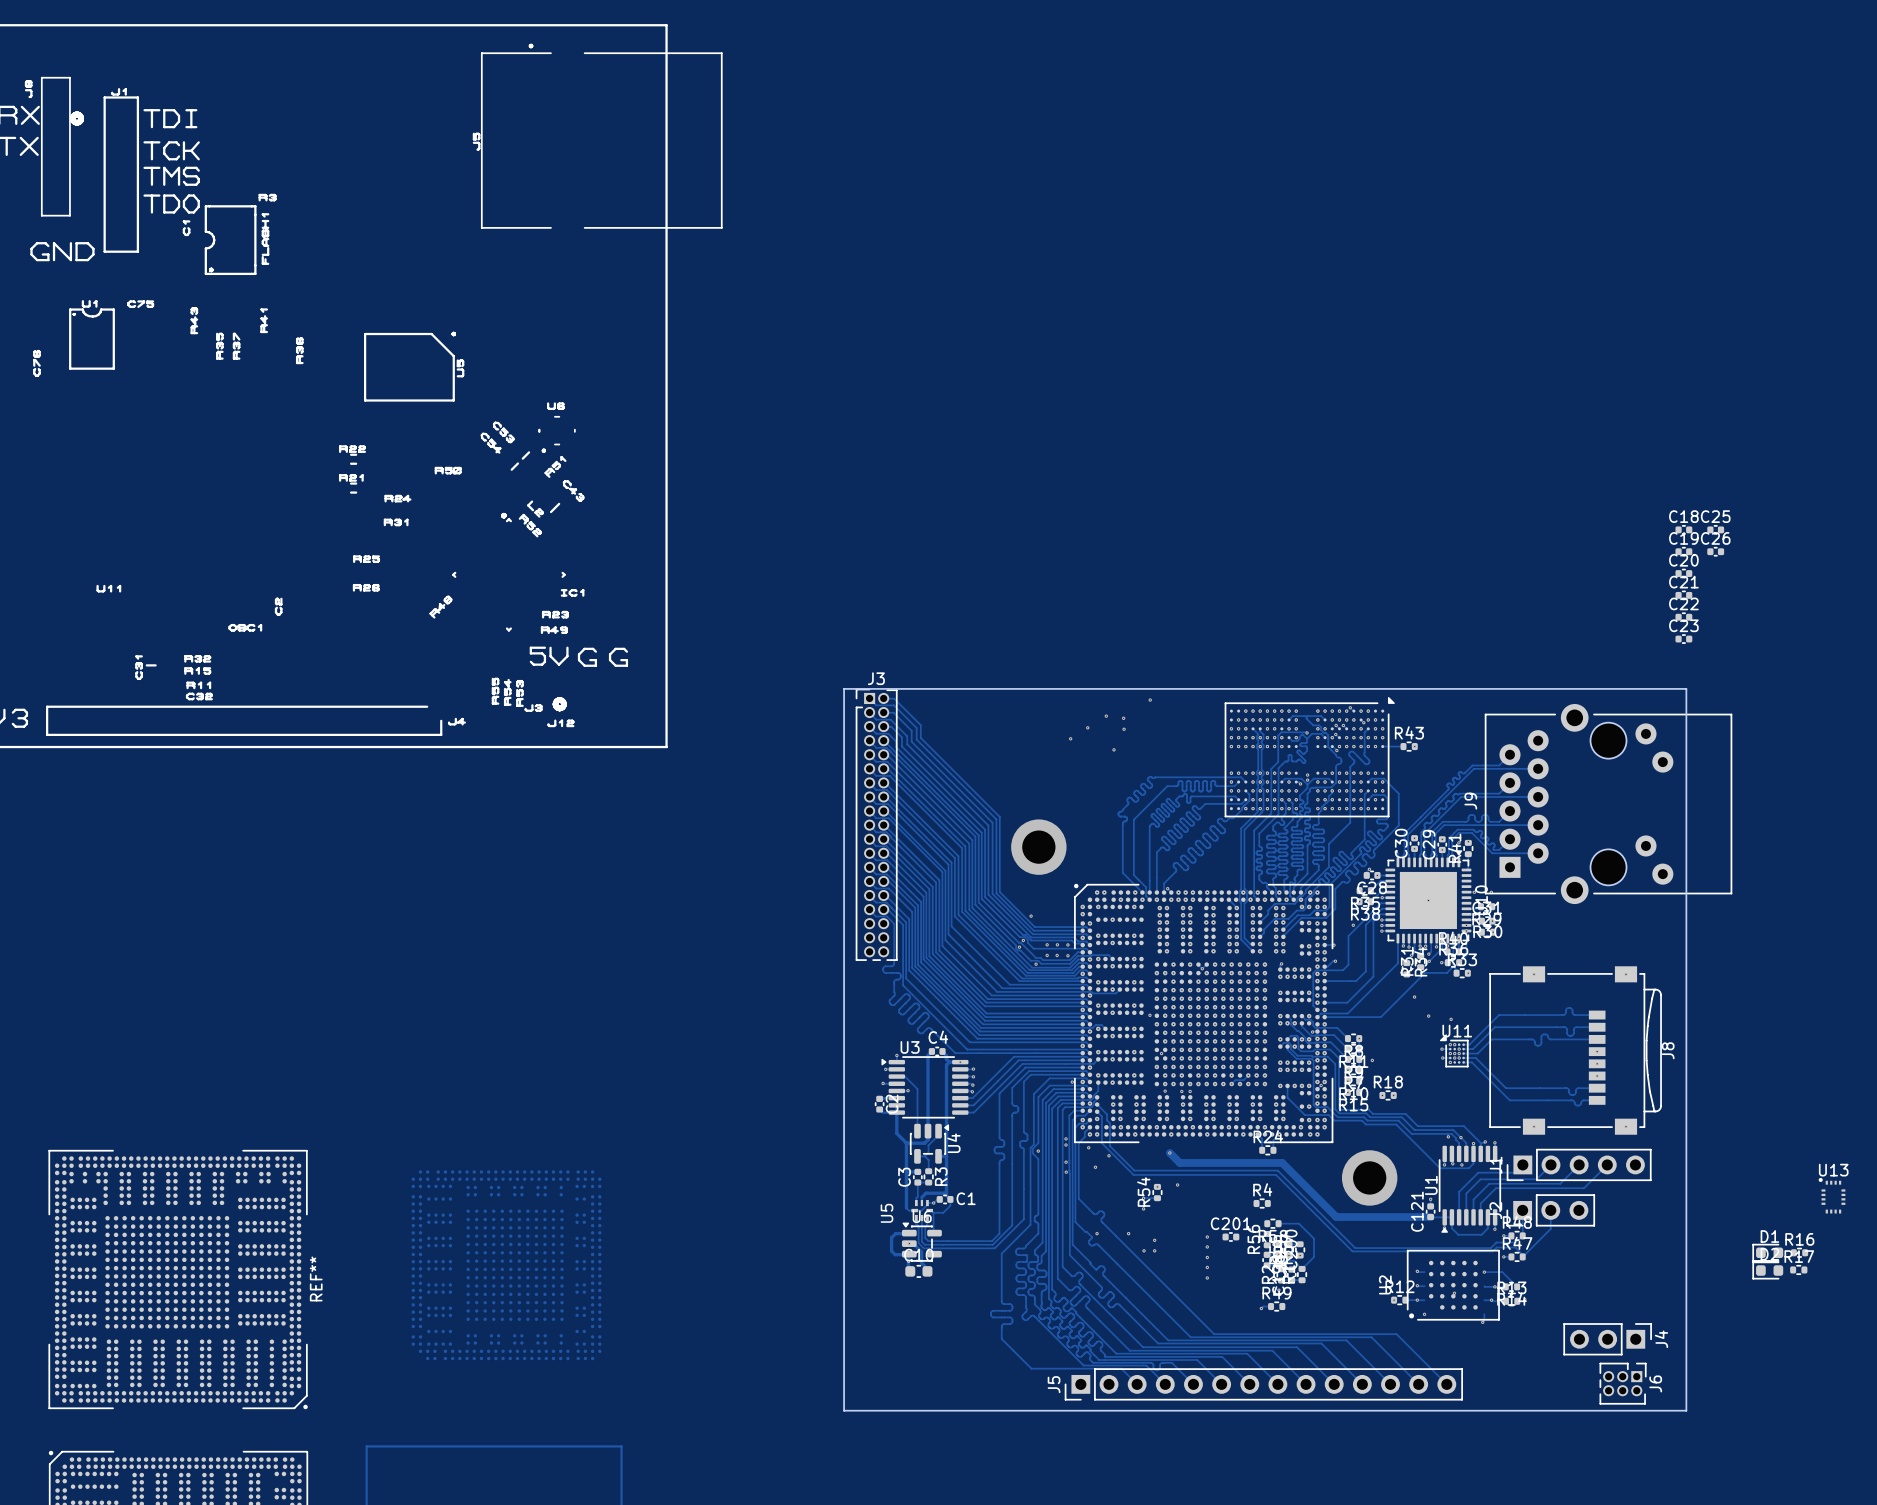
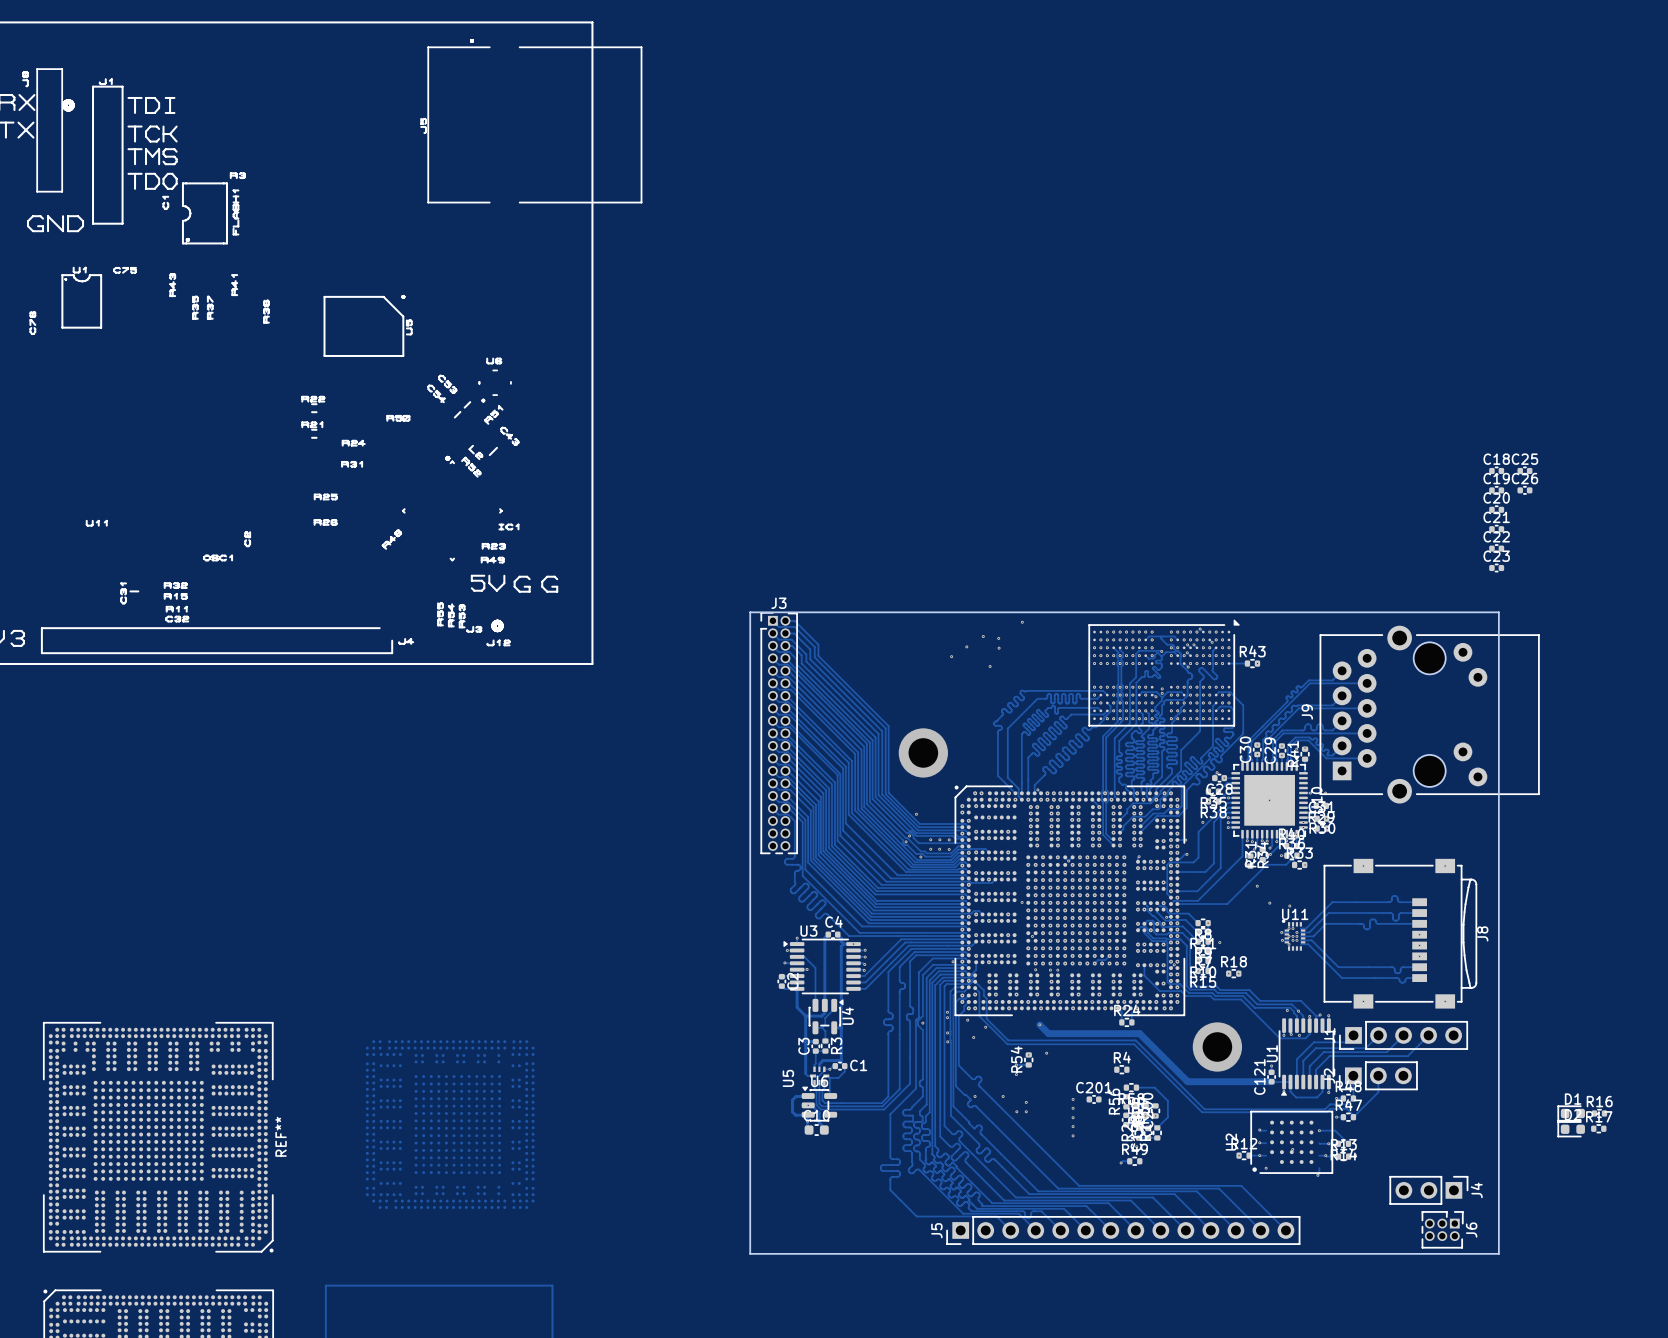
U11 footprint: [1439, 1034, 1469, 1068] -> [1281, 919, 1306, 951]
U13: (1832, 1195) -> none

